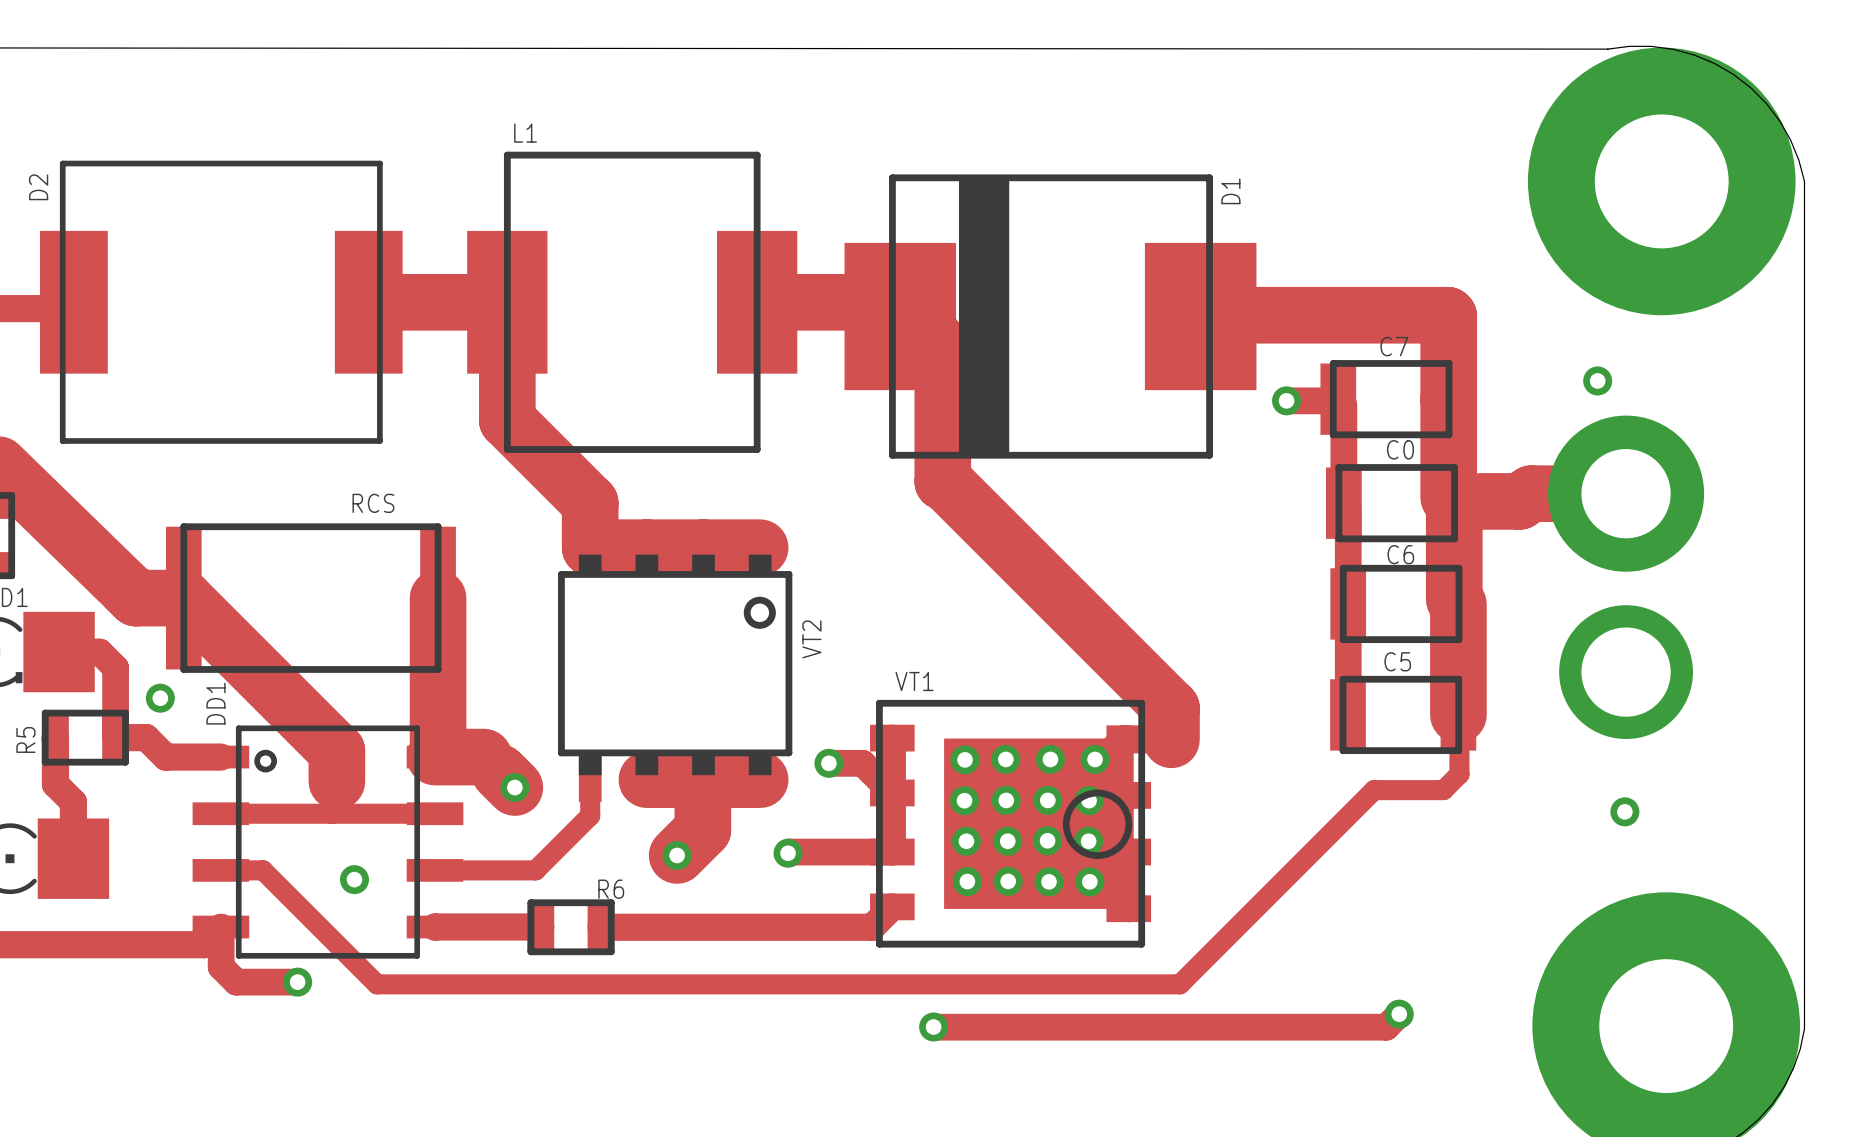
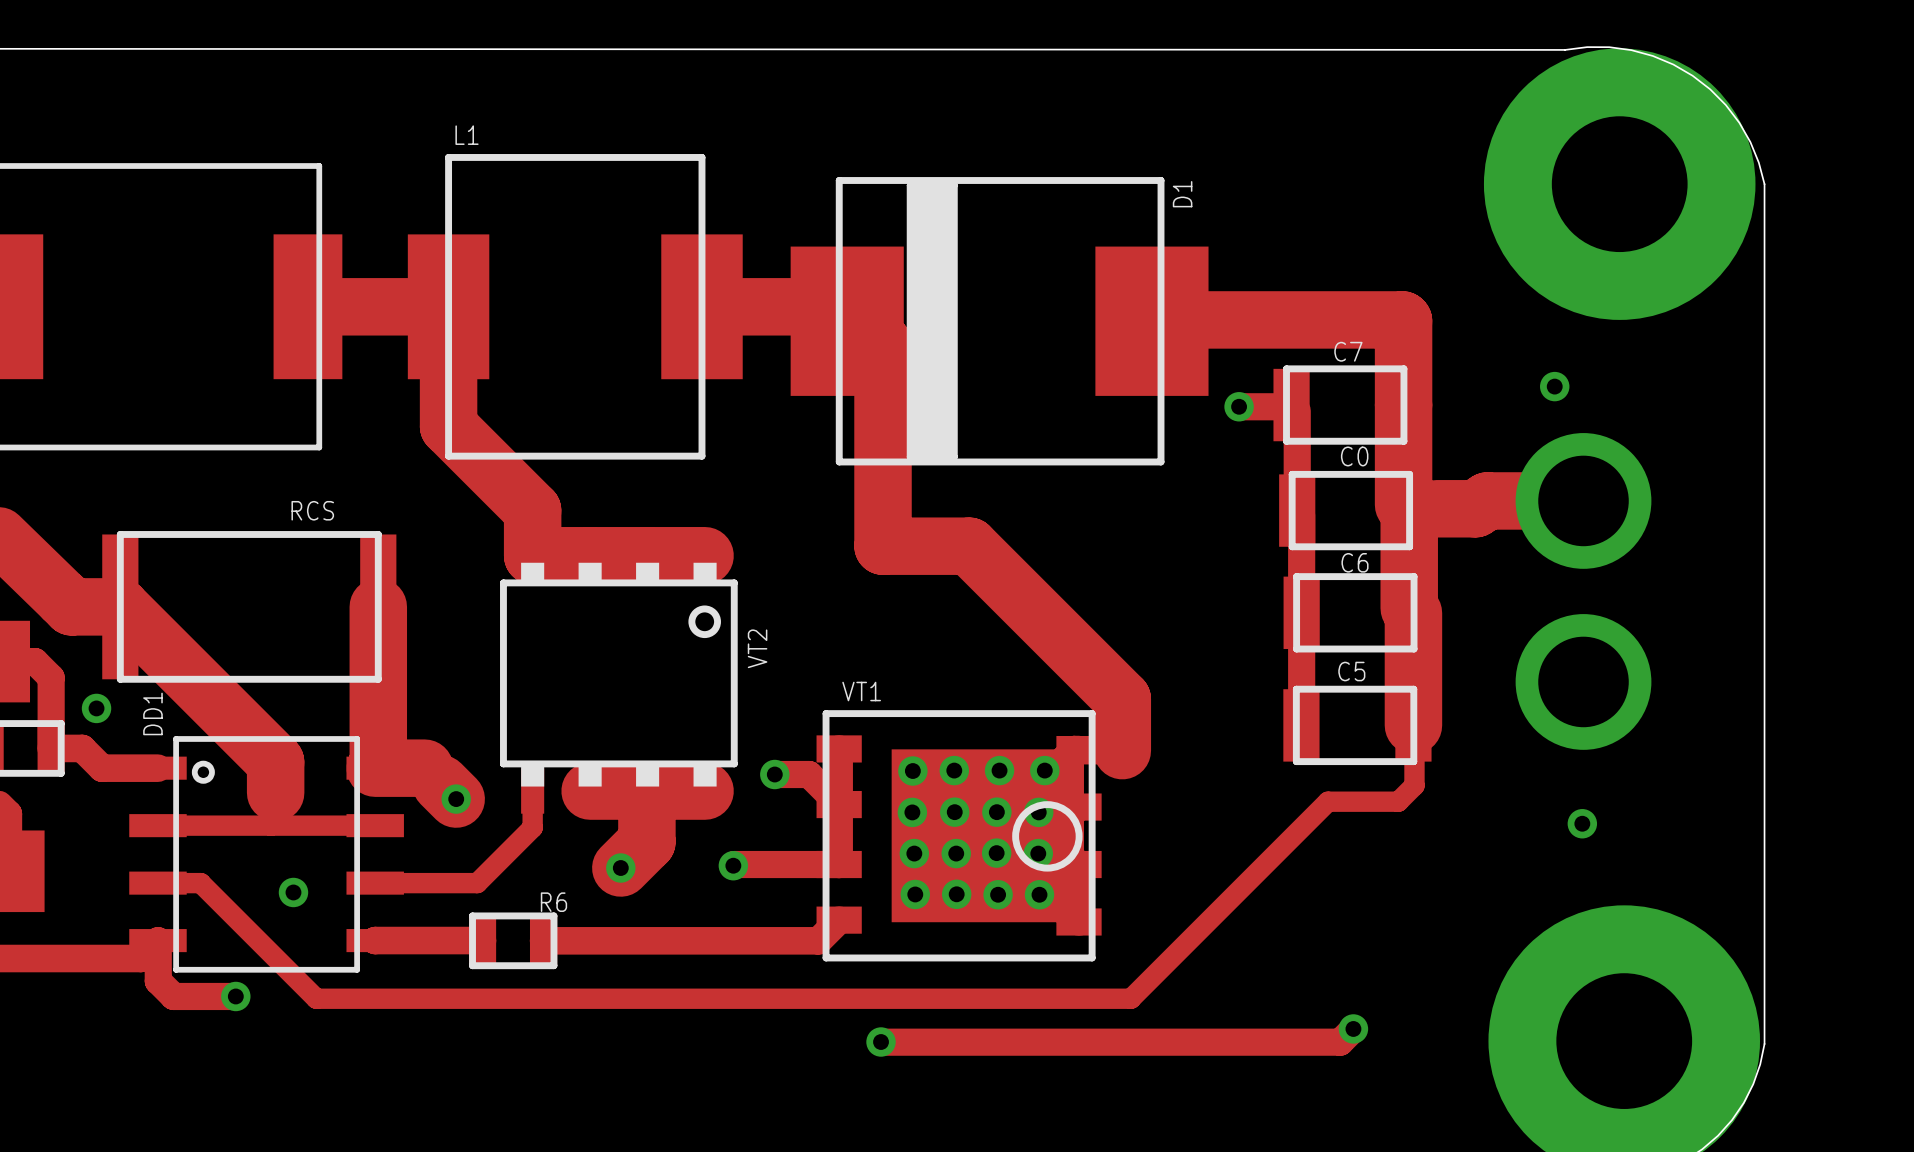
track: (935, 338) (942, 345) (942, 481) (1171, 708) -> (883, 343) (883, 546) (969, 546) (1122, 699) (1122, 718)
via size: [1547, 415, 1705, 572] -> [1515, 433, 1652, 569]

